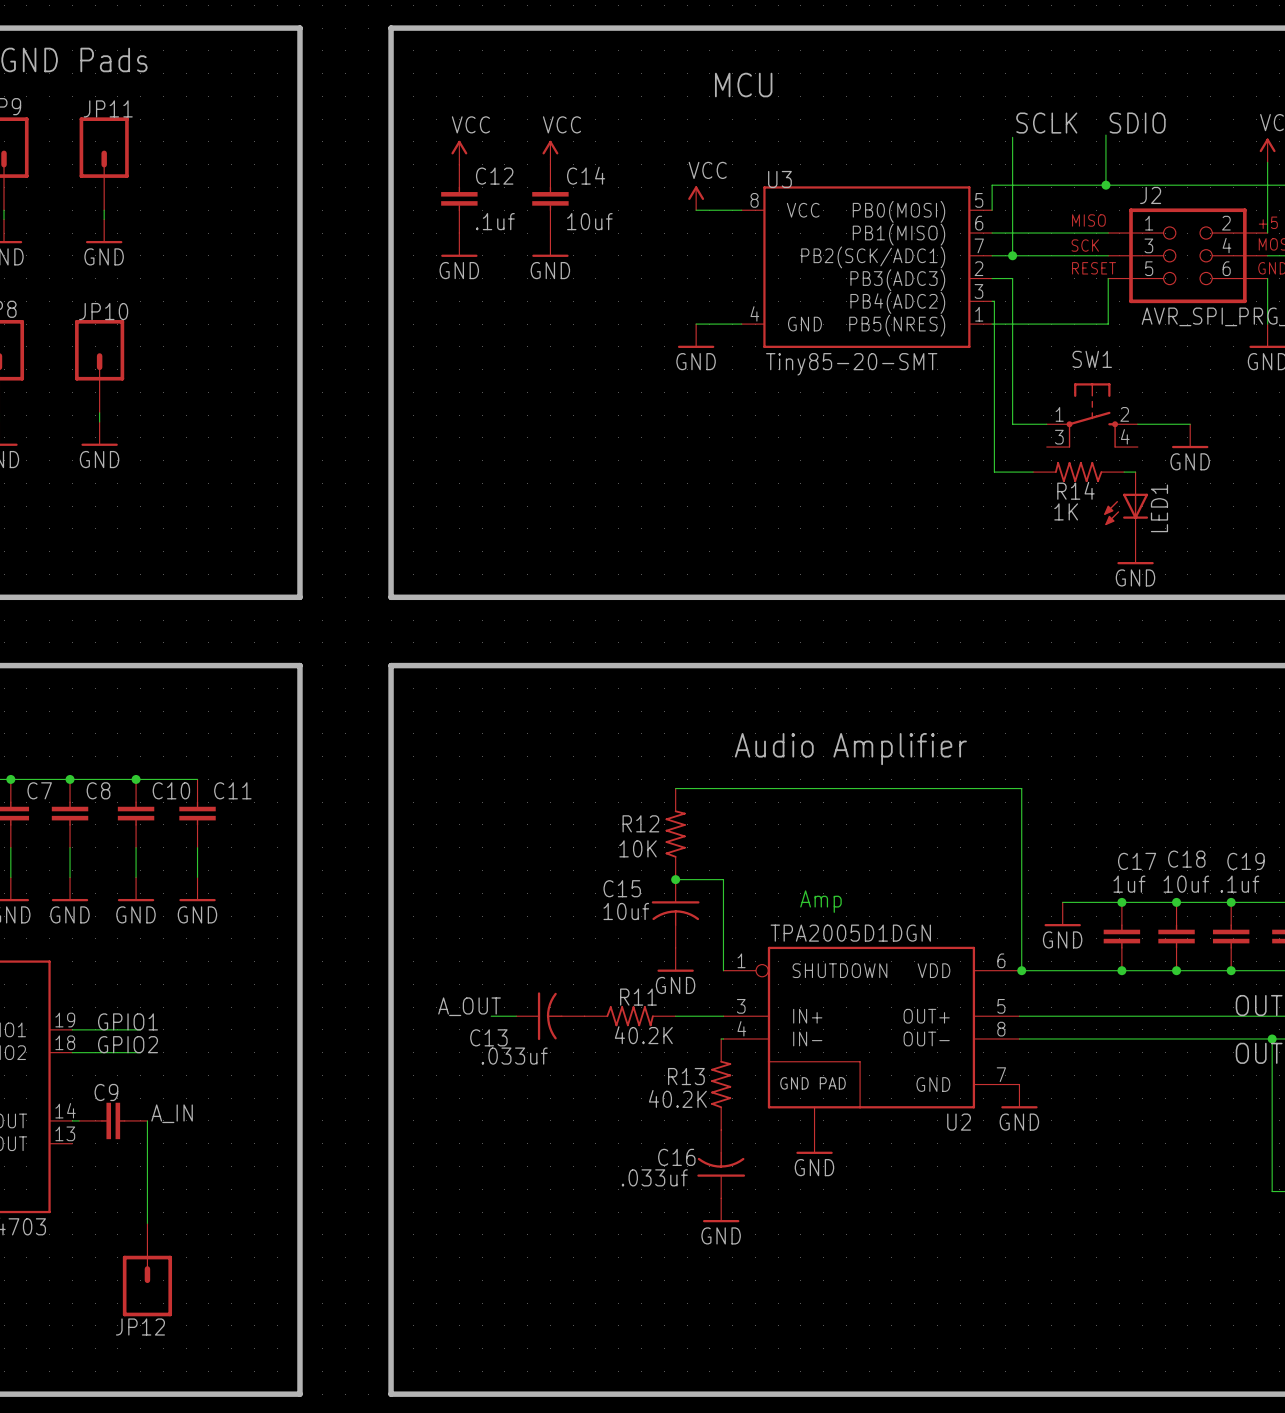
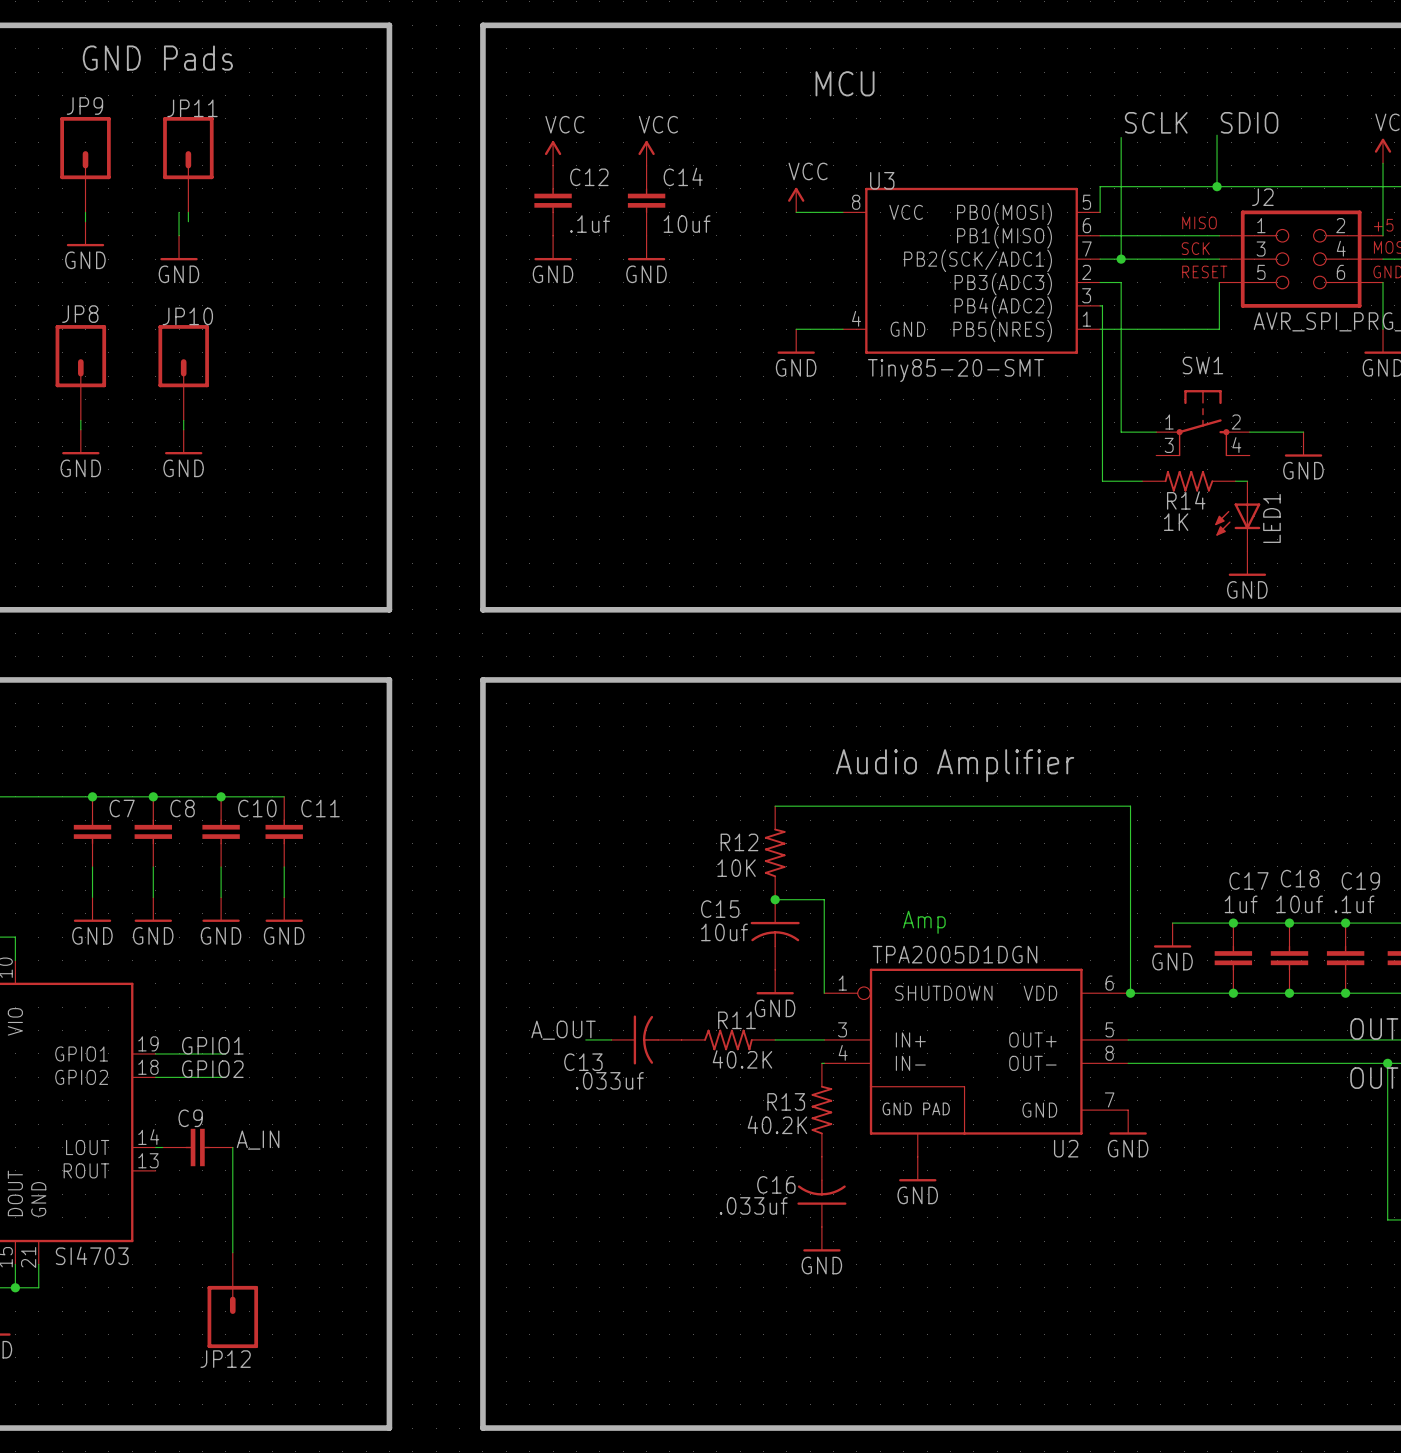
wire: none -> (179, 212) (179, 235)
power symbol position: GND (104, 231) -> GND (179, 248)

